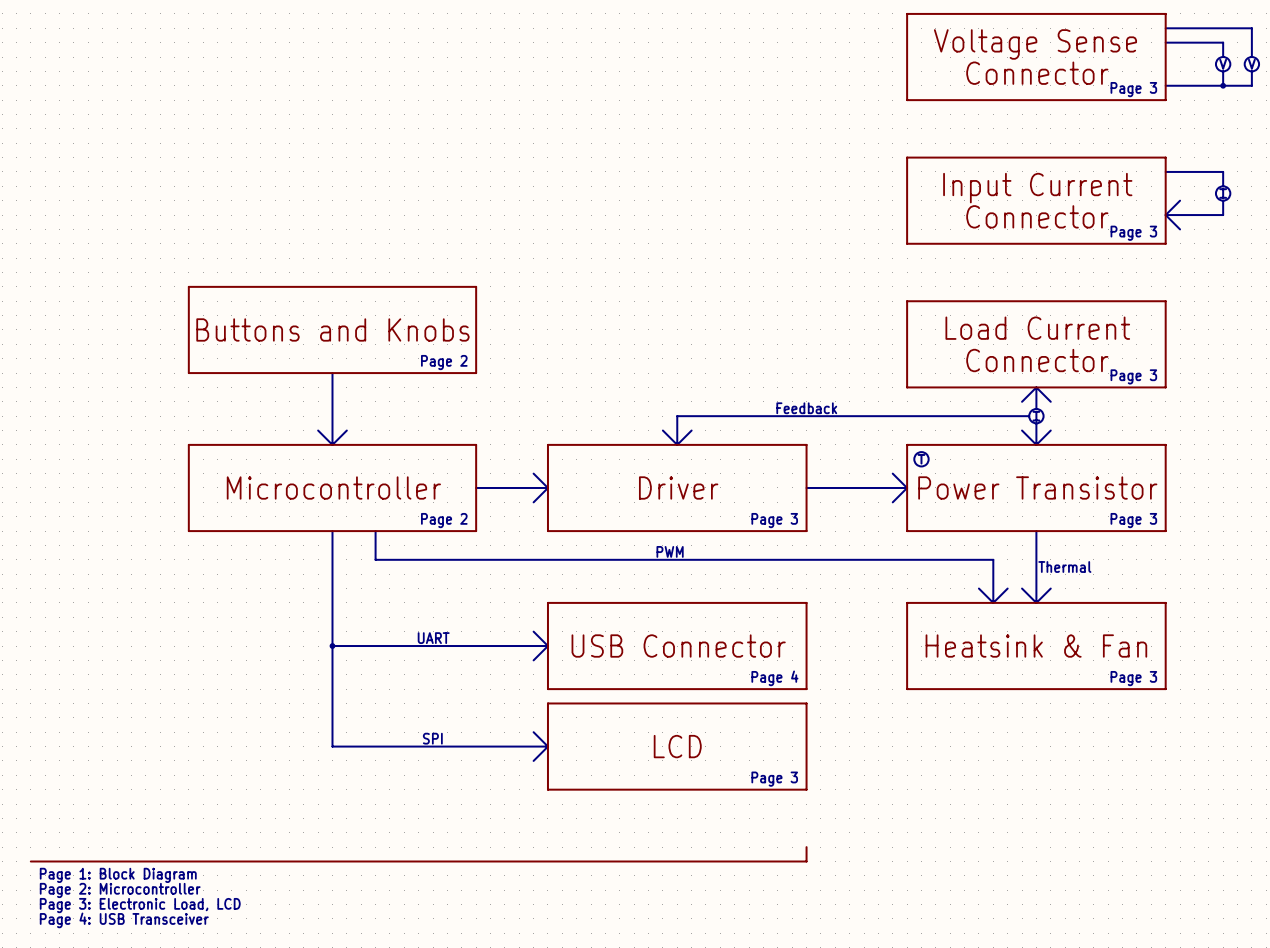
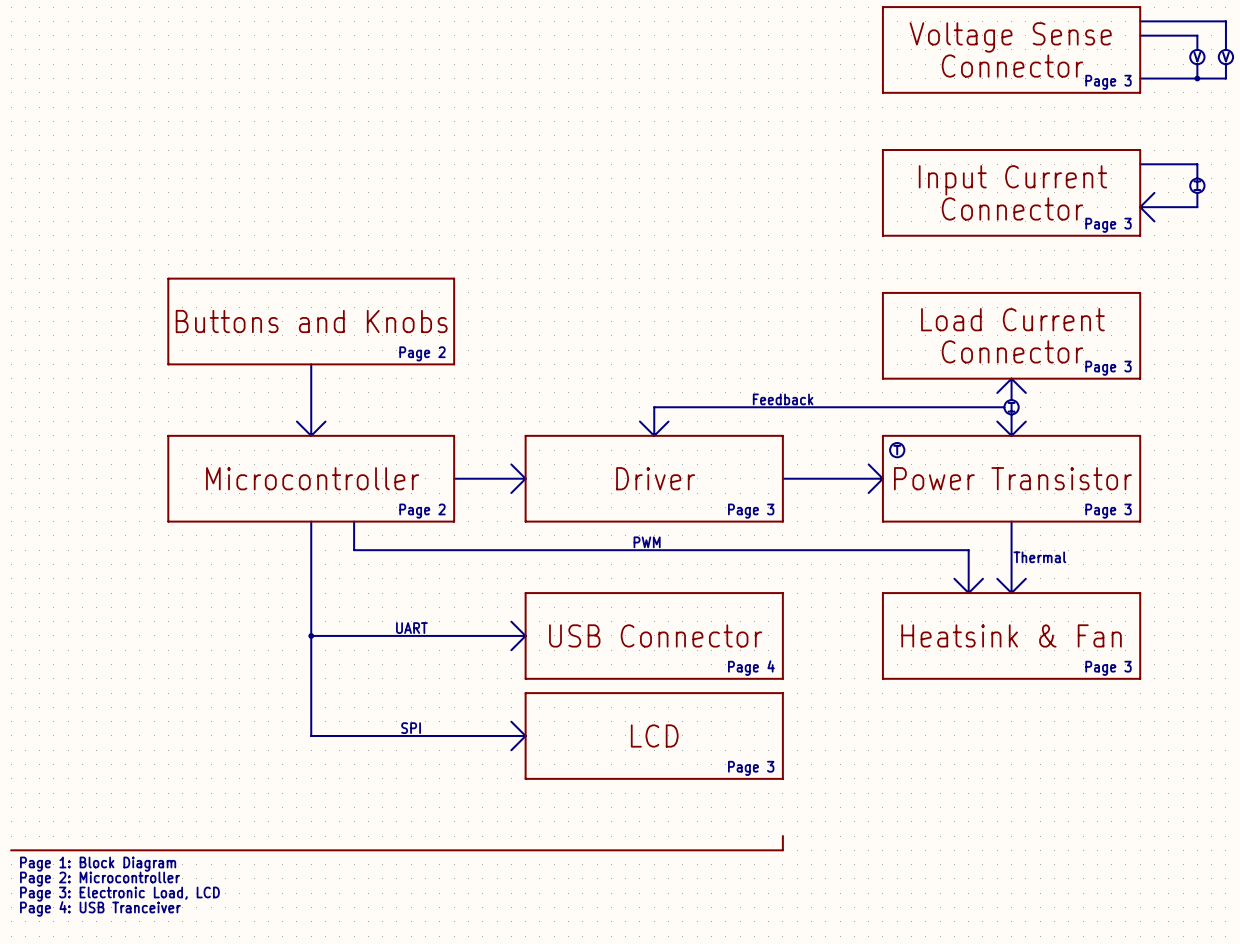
text: Page 4: USB Transceiver (124, 920) -> Page 4: USB Tranceiver (100, 908)

